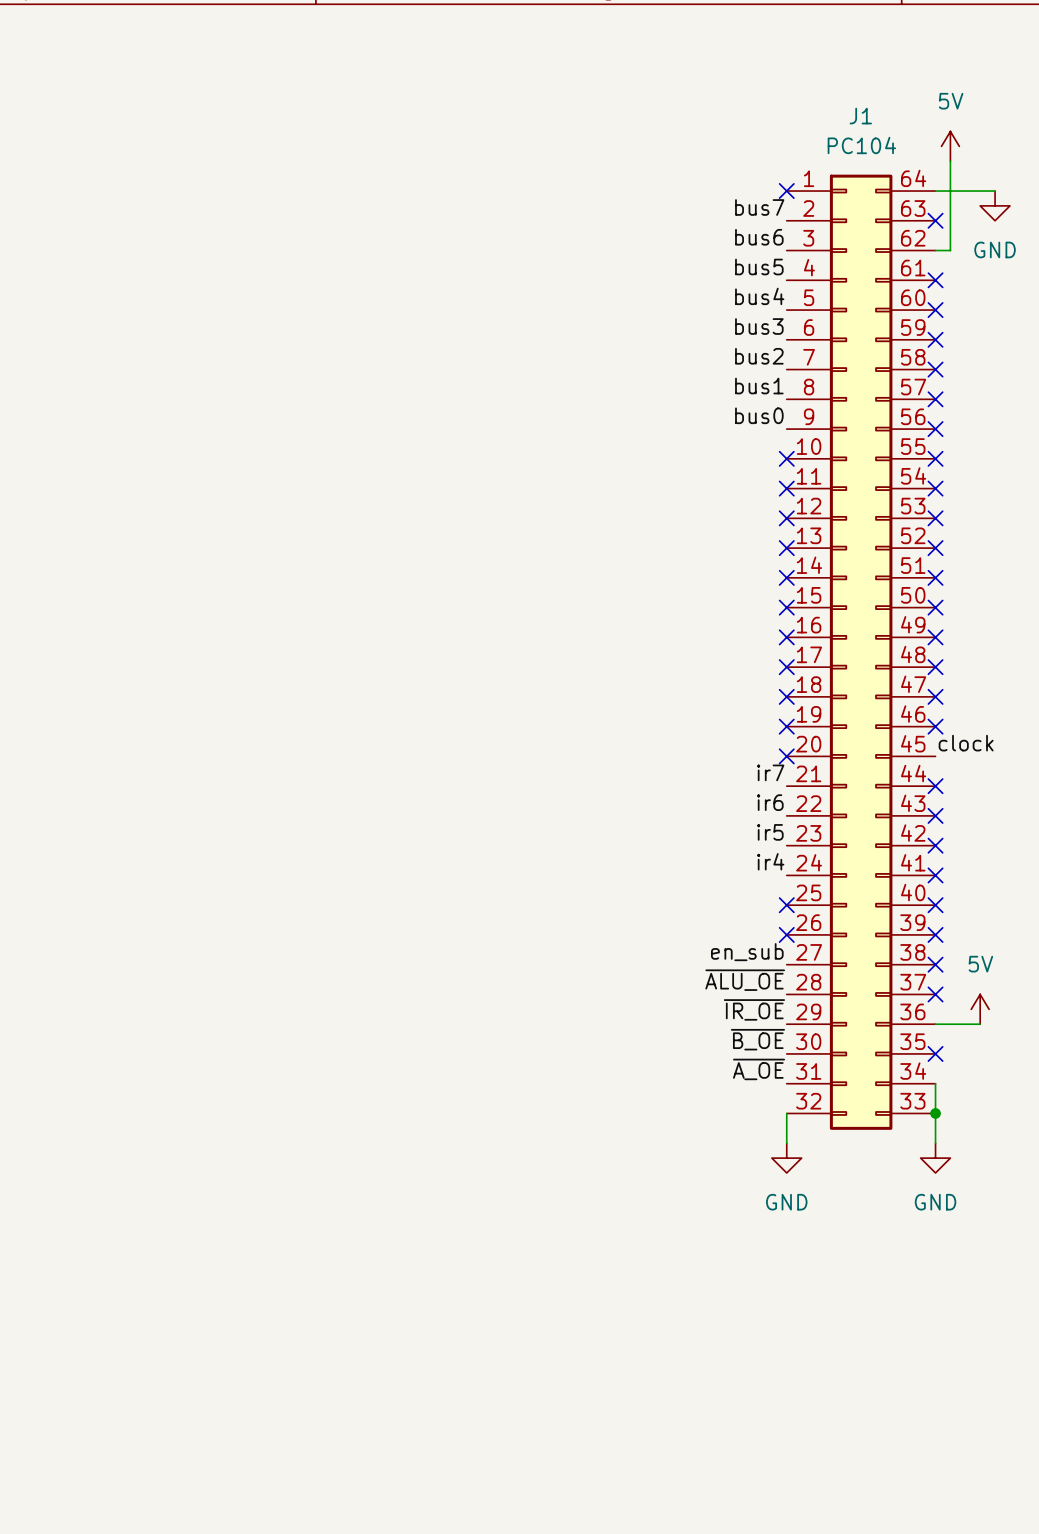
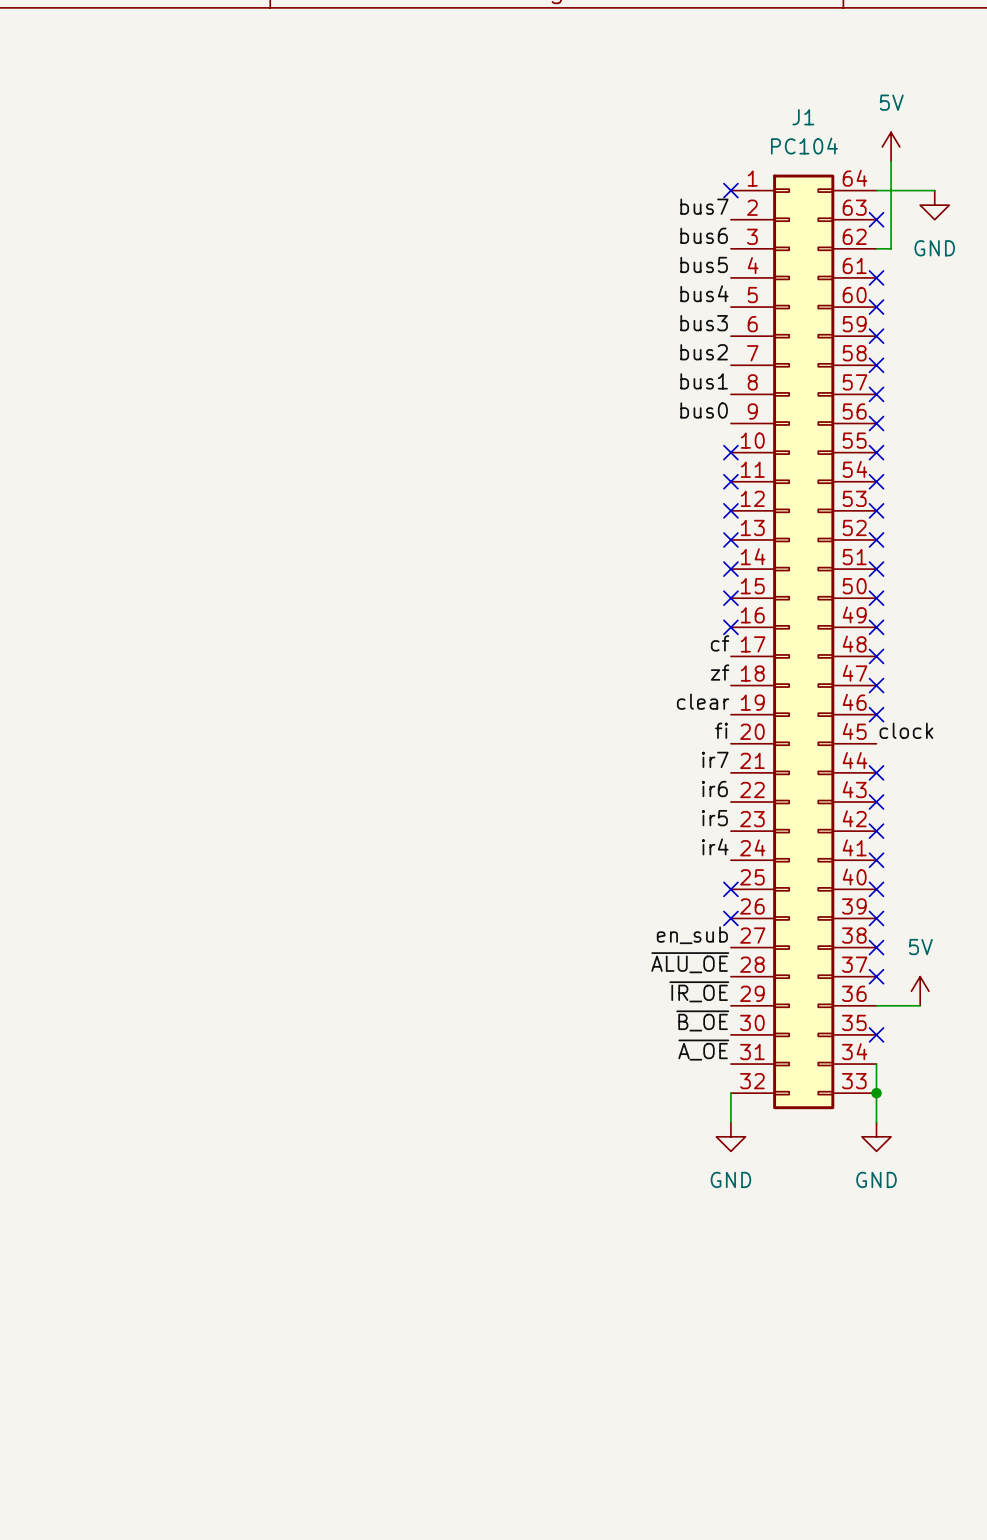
label: none -> cf (720, 643)
no-connect mark: (786, 667) -> none
label: none -> zf (720, 672)
no-connect mark: (786, 696) -> none
label: none -> clear (703, 701)
no-connect mark: (786, 726) -> none
label: none -> fi (721, 730)
no-connect mark: (786, 756) -> none

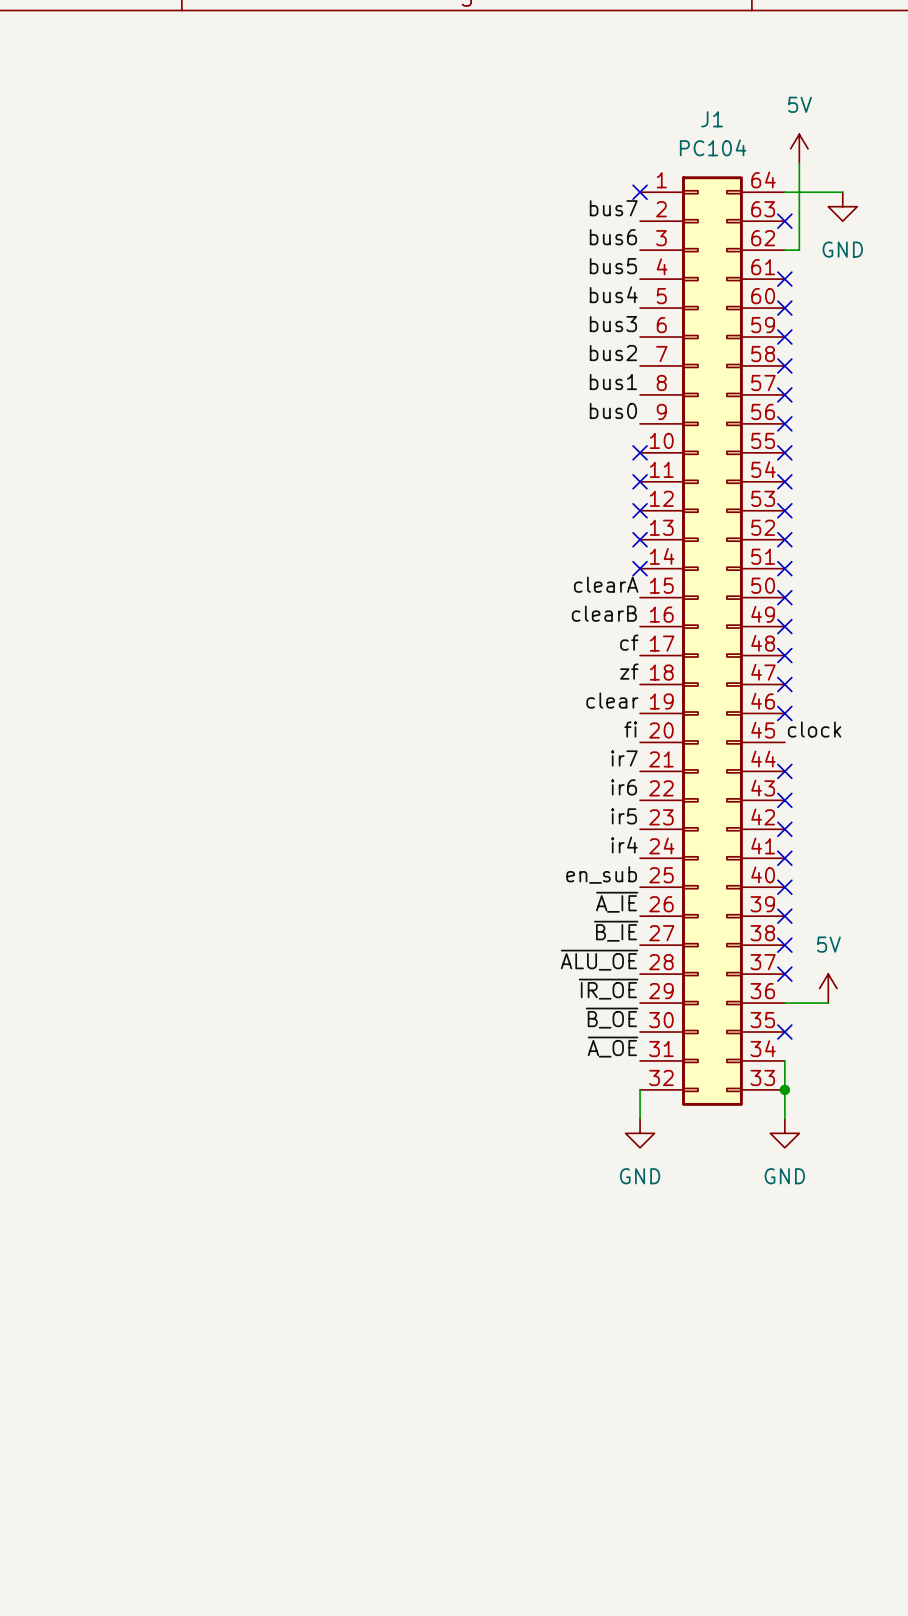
label: none -> clearA (606, 584)
no-connect mark: (730, 598) -> none
label: none -> clearB (604, 613)
no-connect mark: (730, 627) -> none
label: none -> en_sub (601, 874)
no-connect mark: (730, 889) -> none
label: none -> ~{A_IE} (617, 902)
no-connect mark: (730, 918) -> none
label: en_sub (692, 935) -> ~{B_IE} (616, 931)

